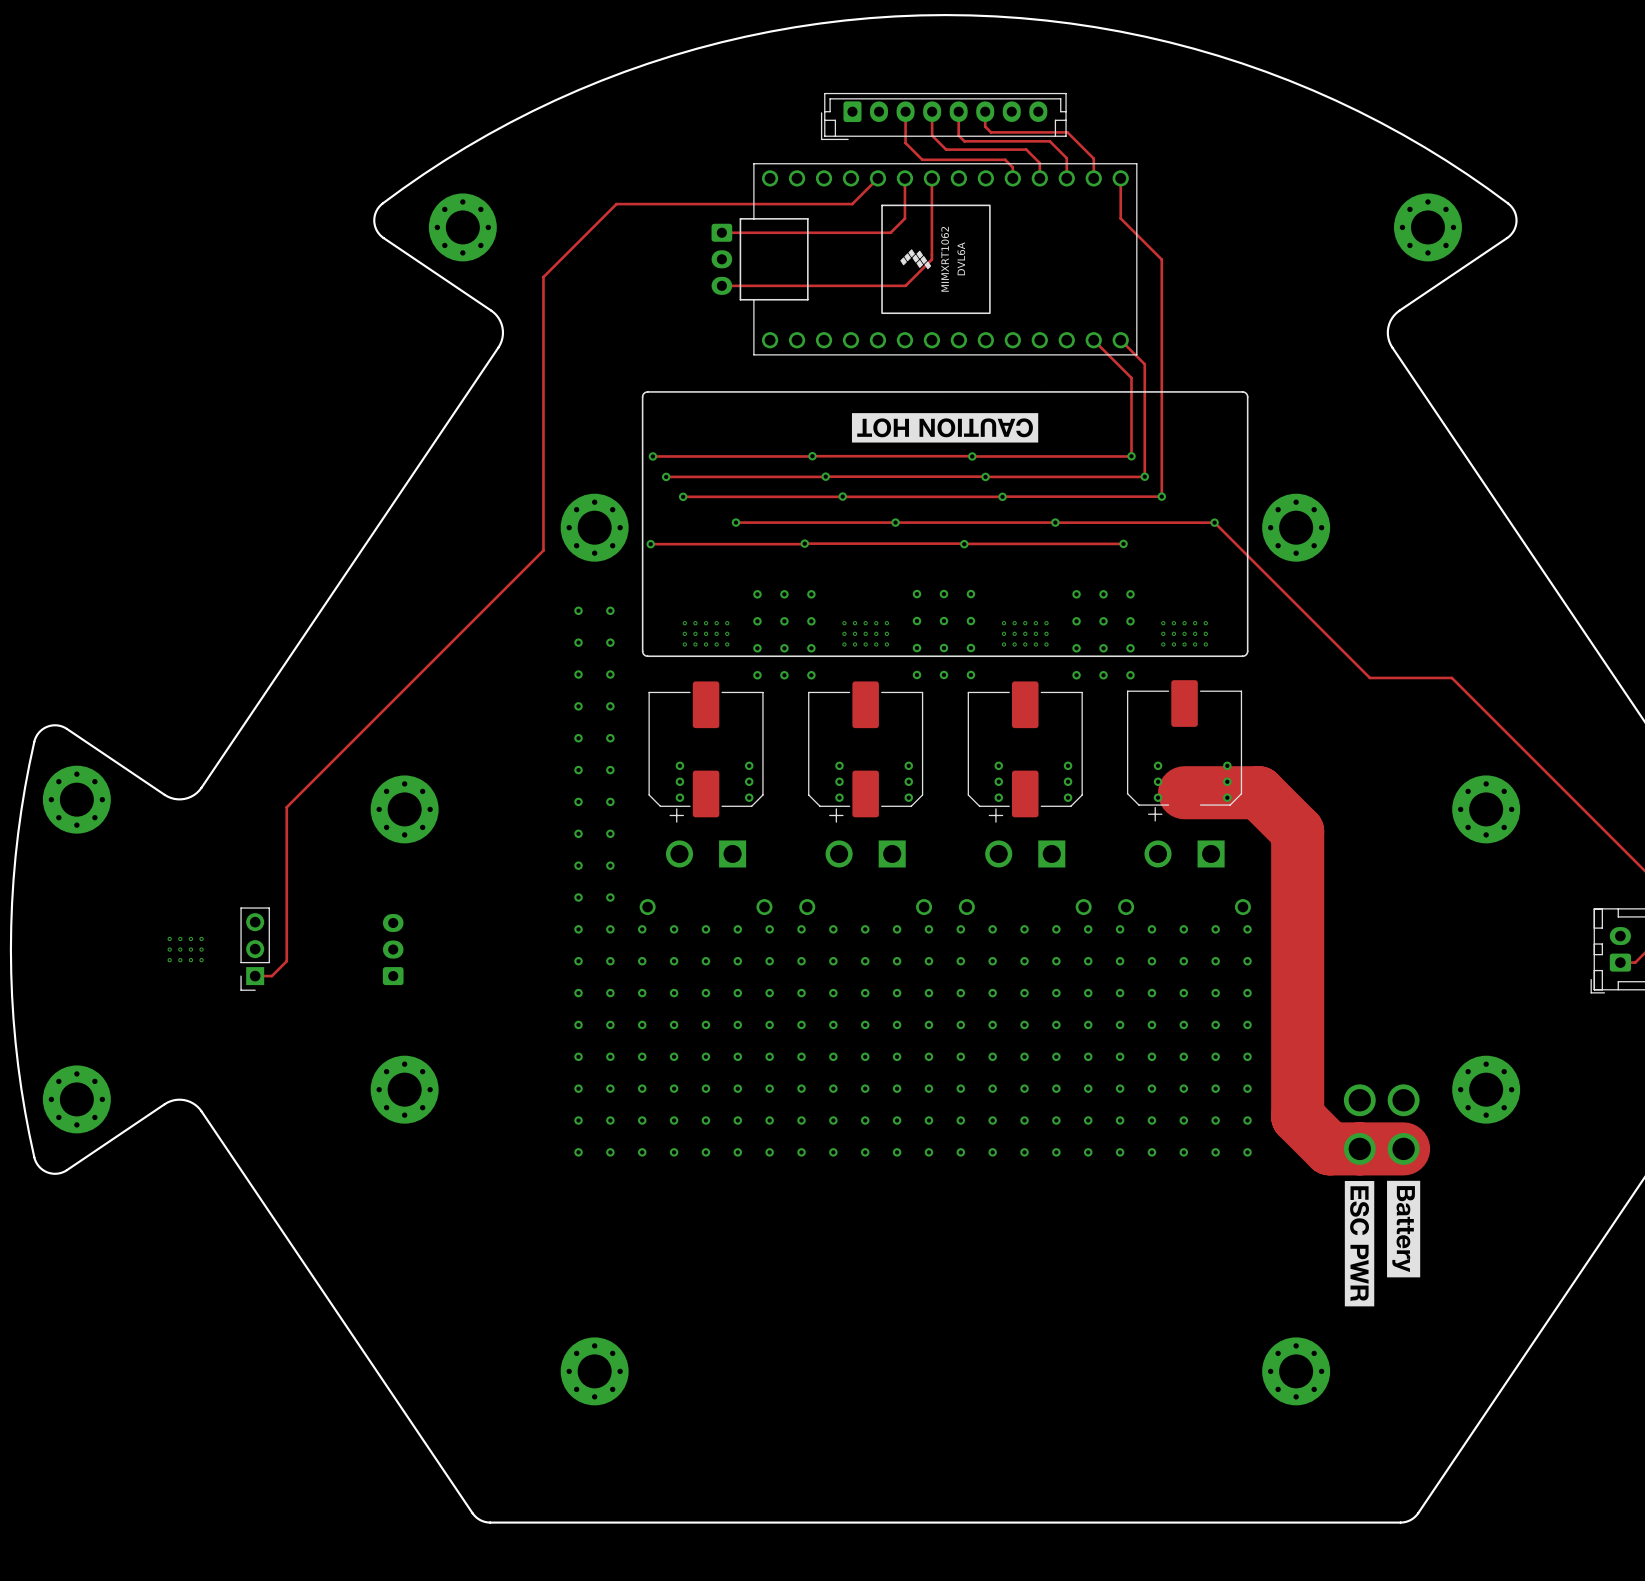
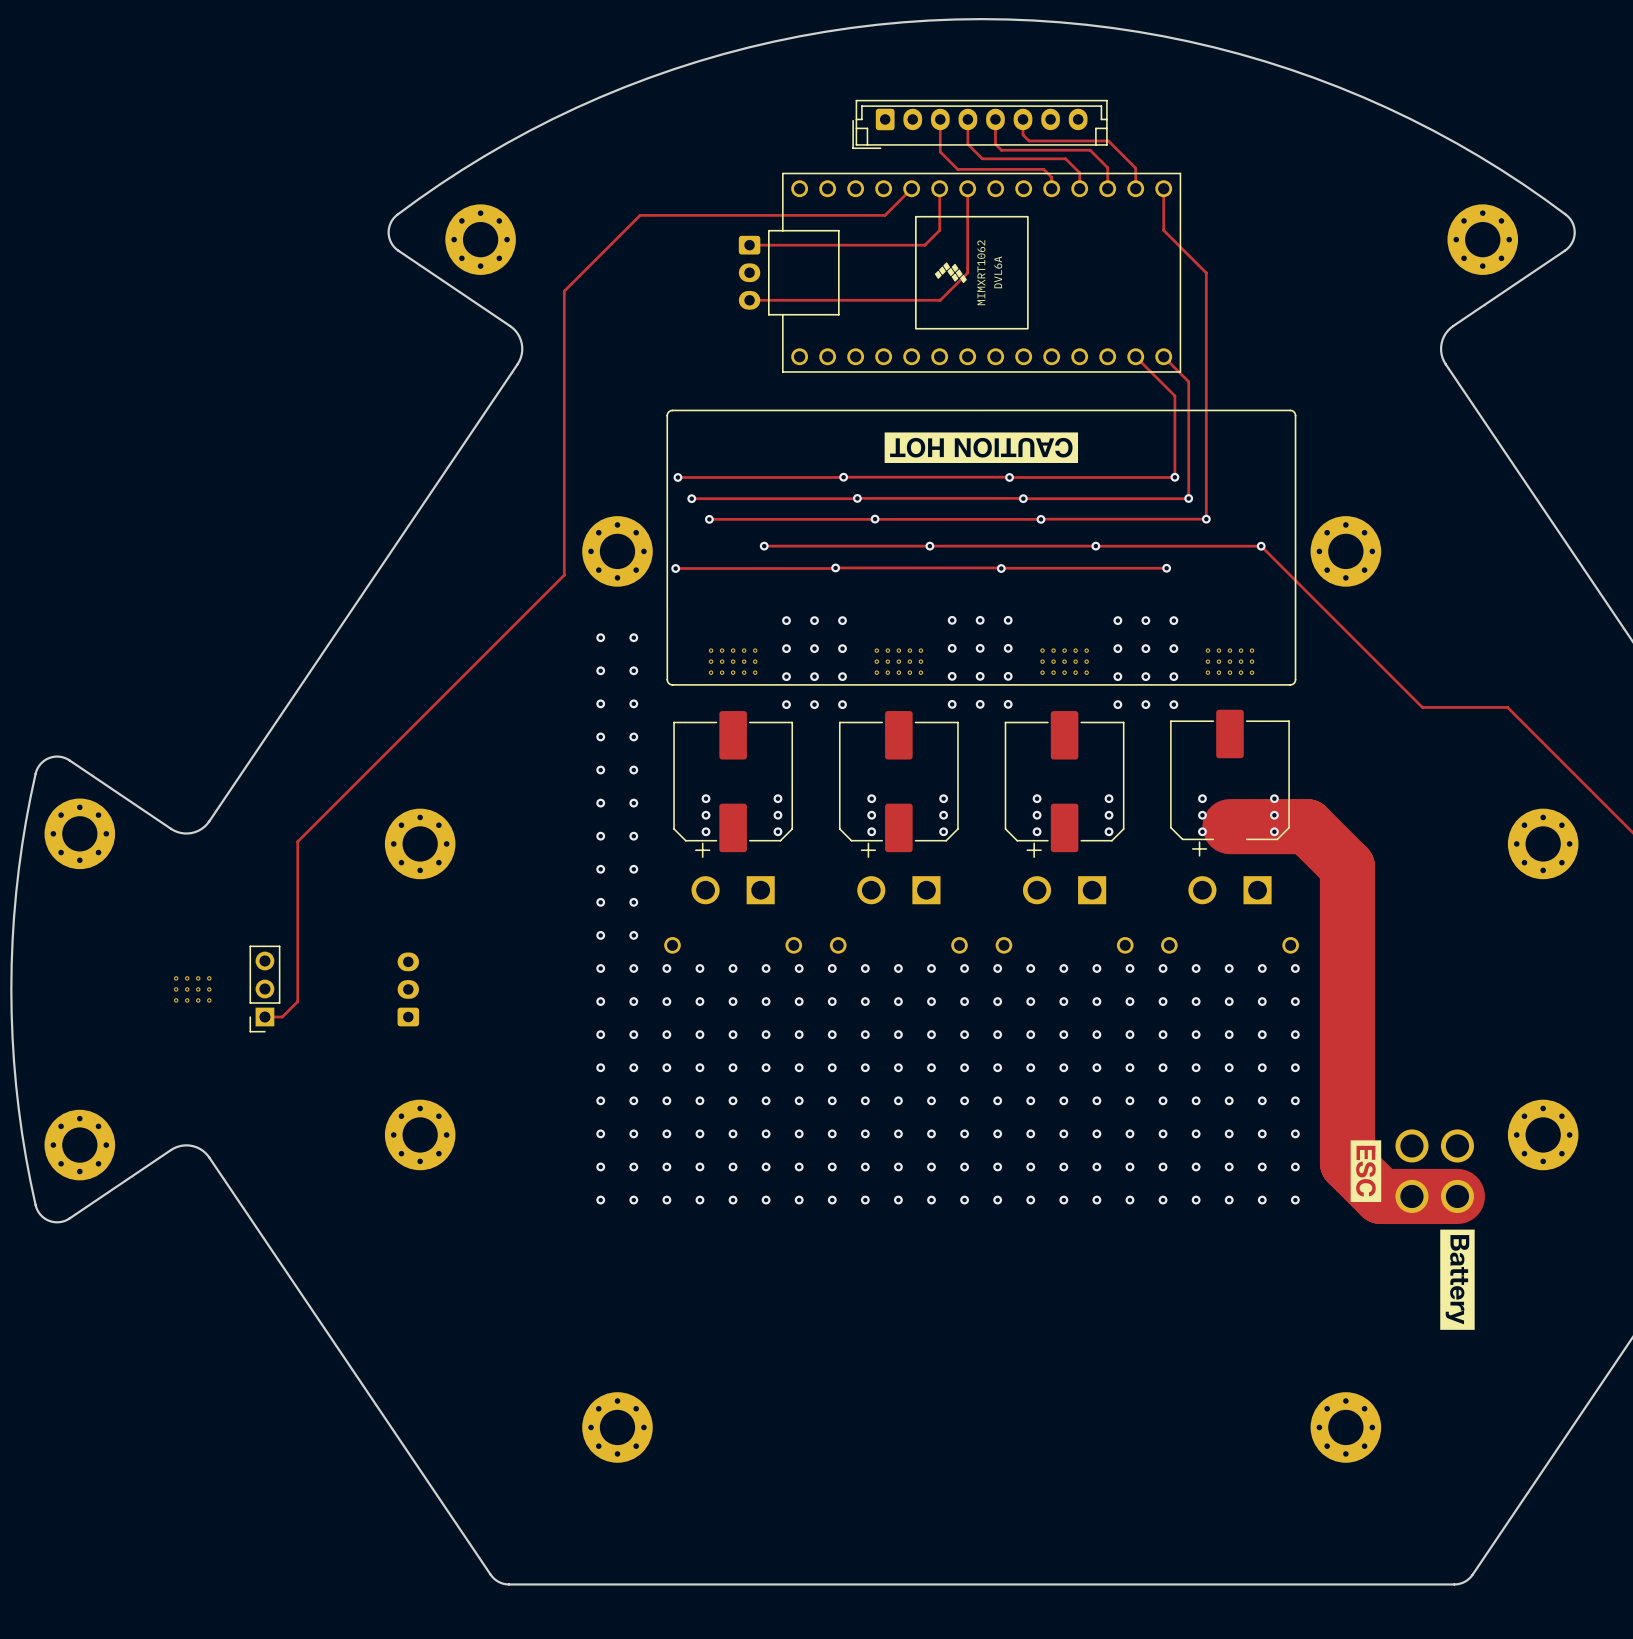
drawing: none -> [1350, 1140, 1382, 1202]
drawing: [1344, 1180, 1375, 1307] -> none

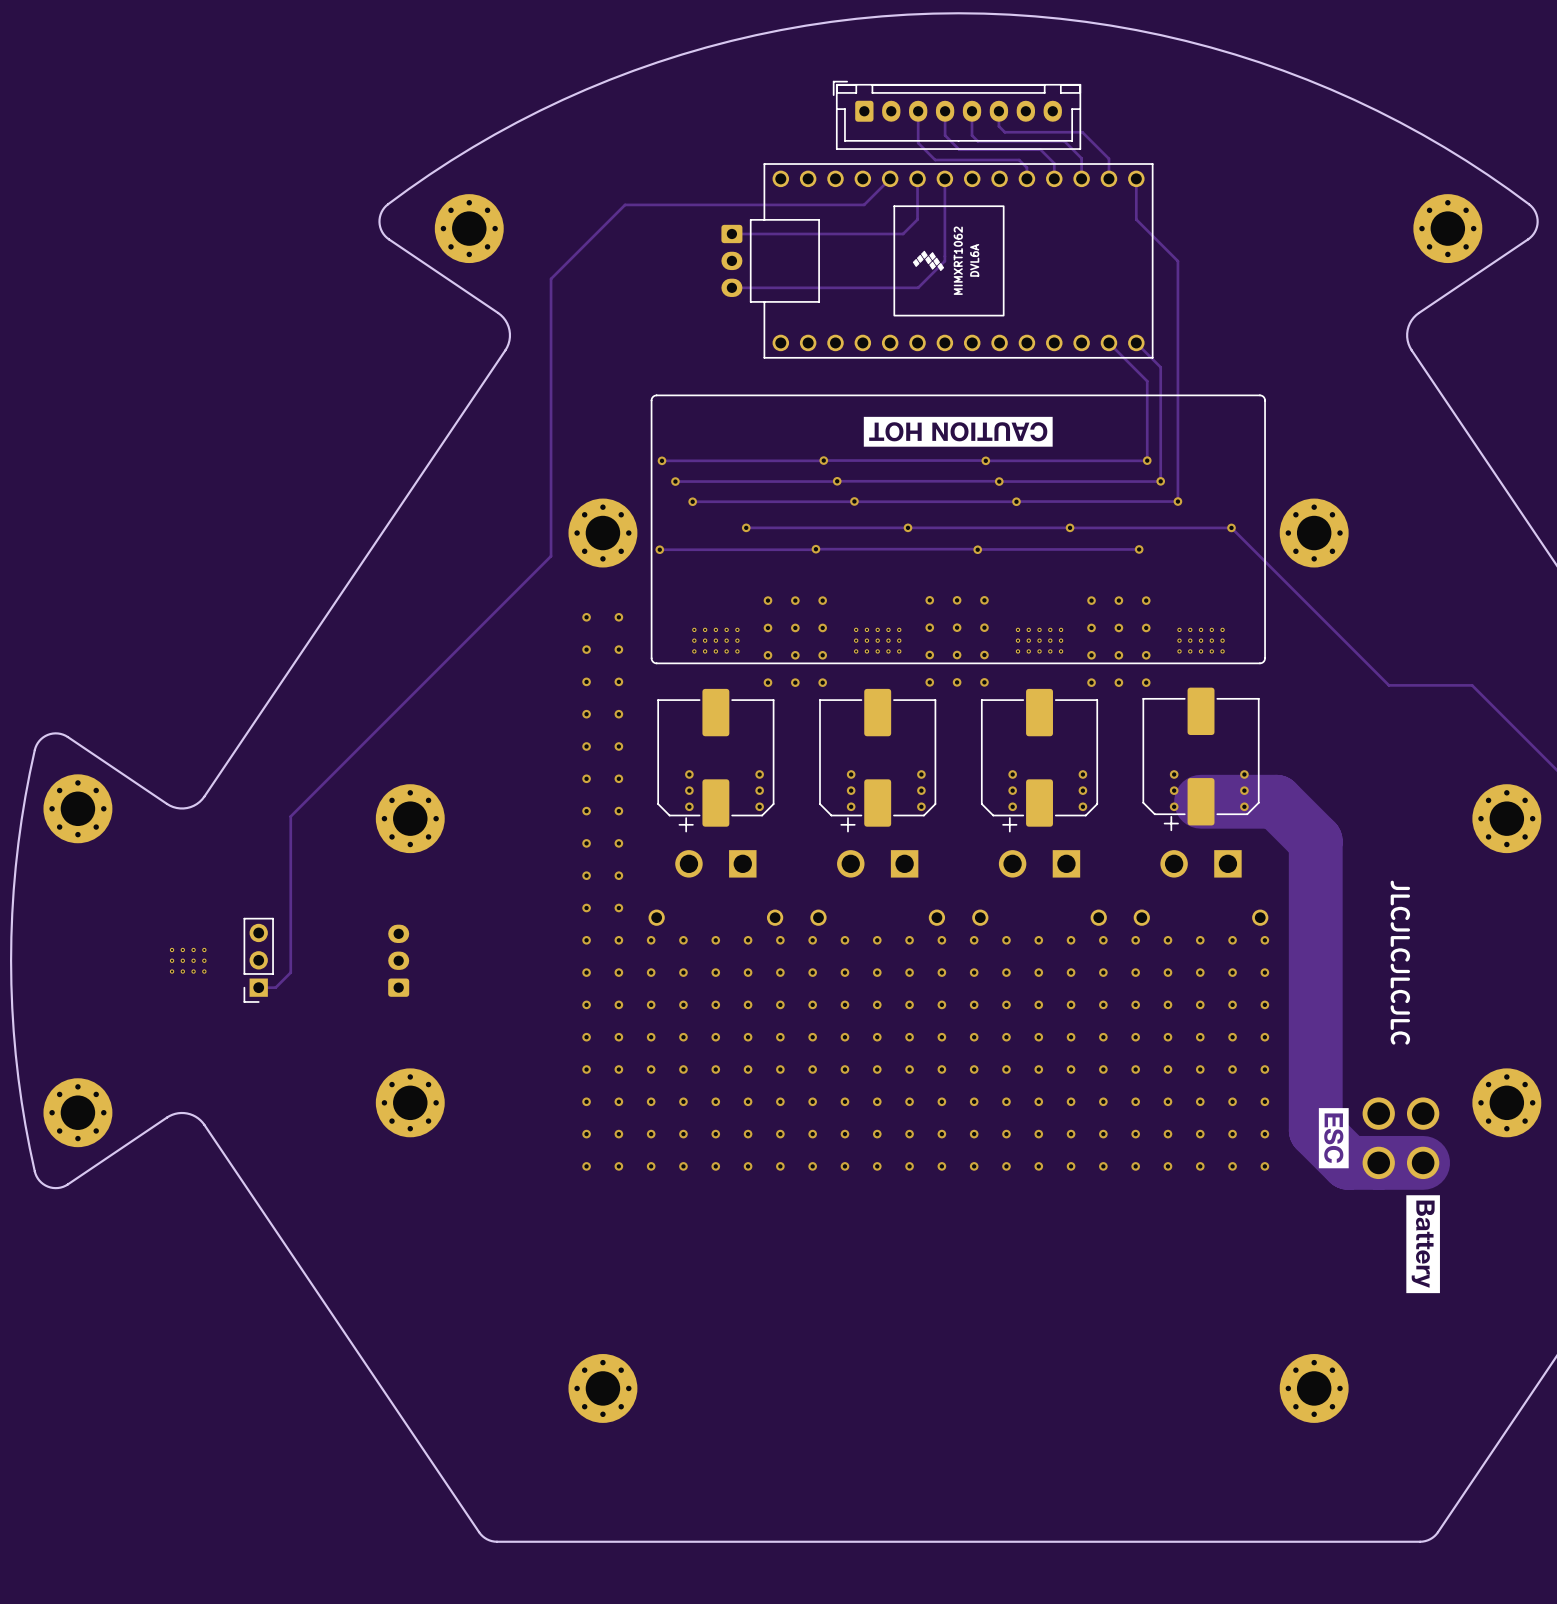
part footprint: [852, 99, 1108, 149] -> [833, 80, 1081, 150]
text: none -> JLCJLCJLCJLC (1400, 962)

